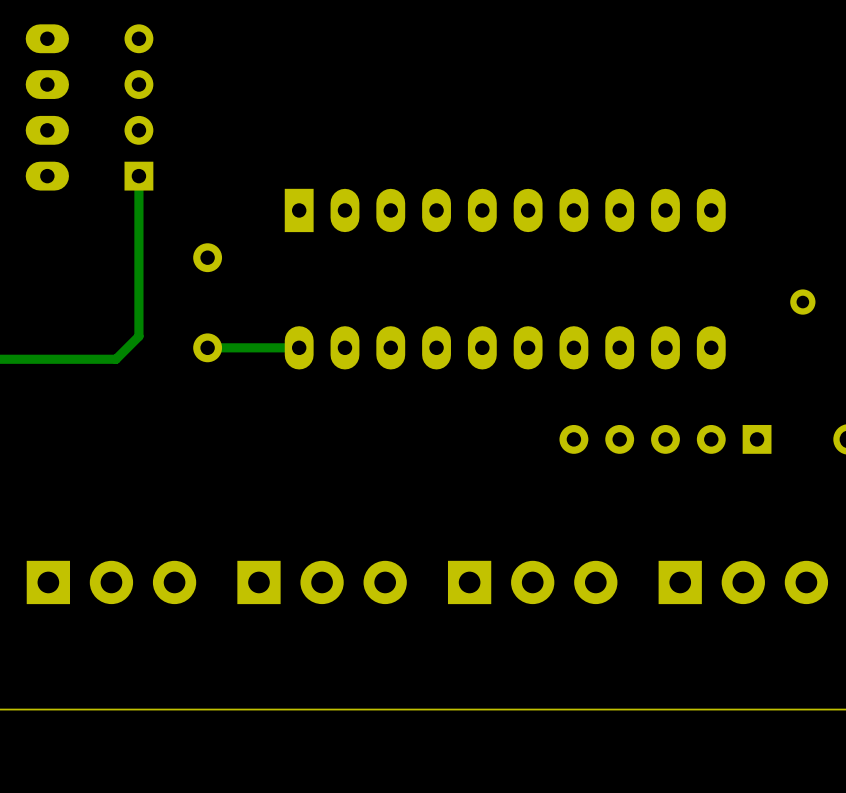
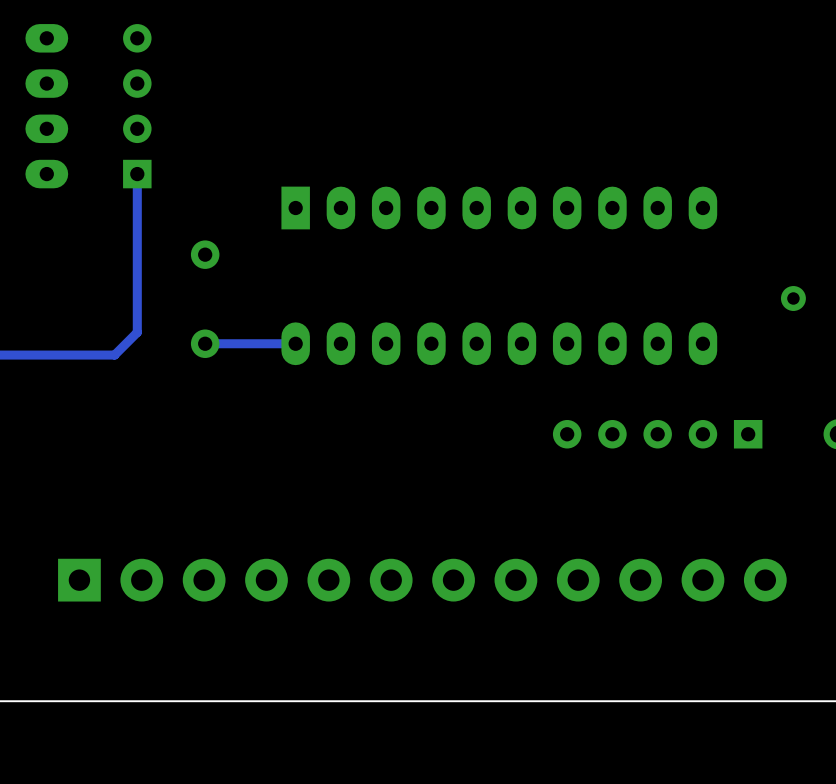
part: (111, 582) -> none
part: (322, 582) -> none
part: (532, 582) -> none
part: (743, 582) -> none
part: none -> (422, 580)

